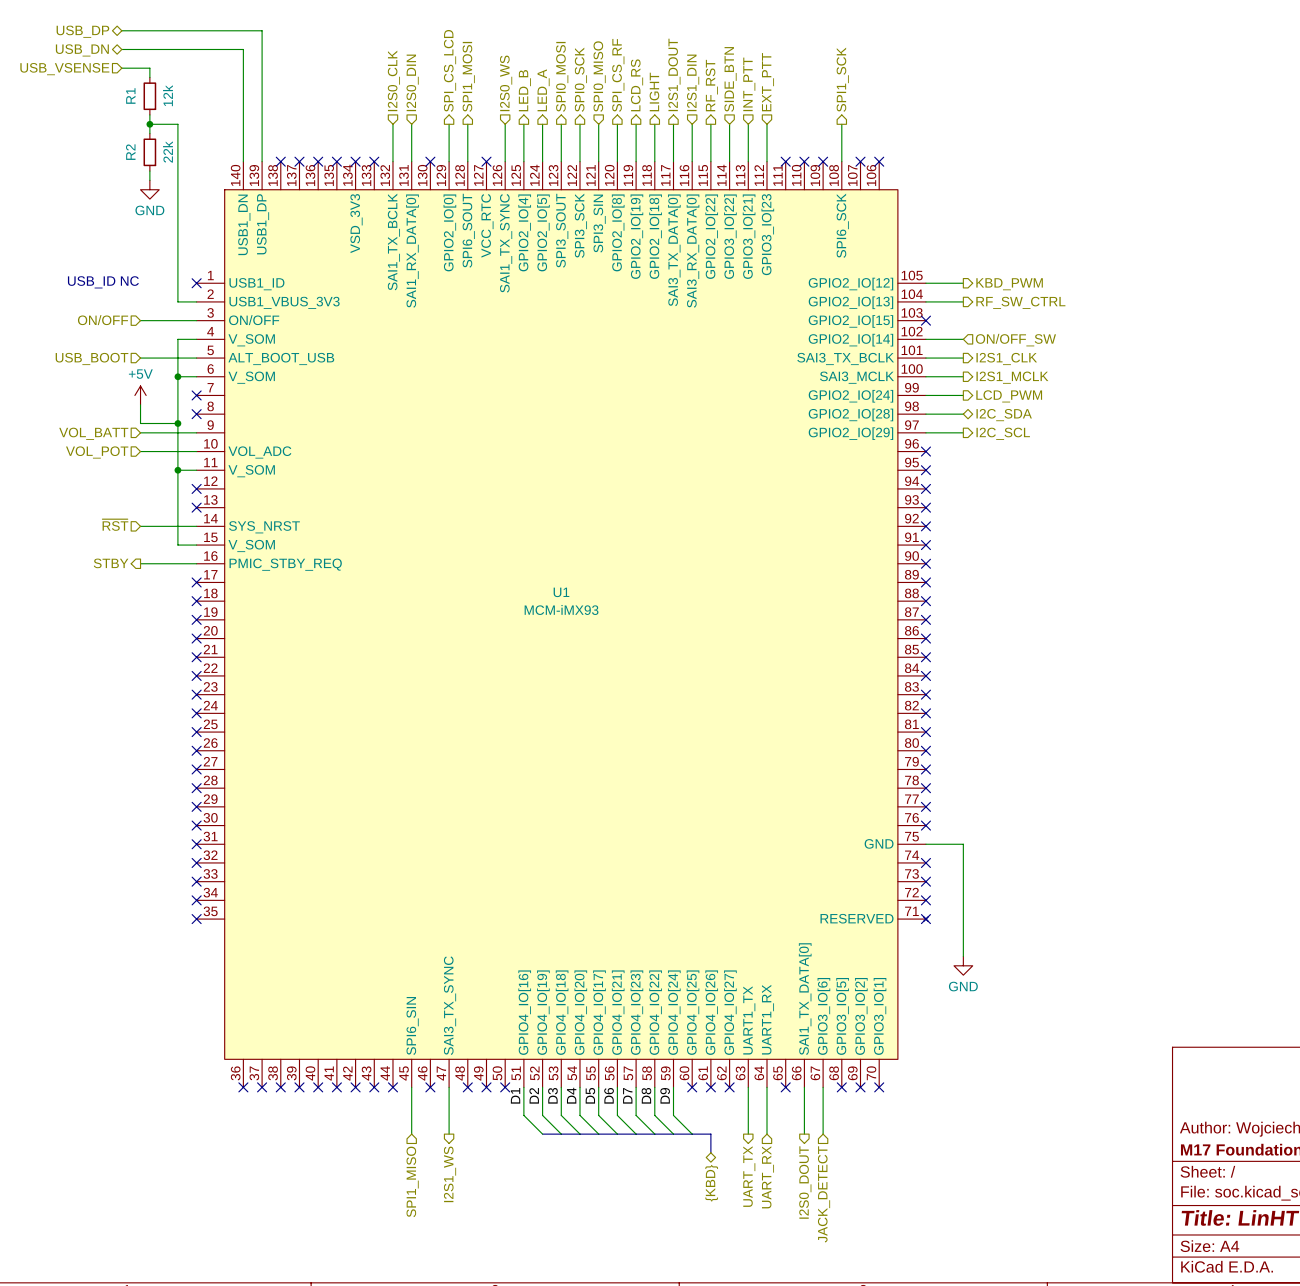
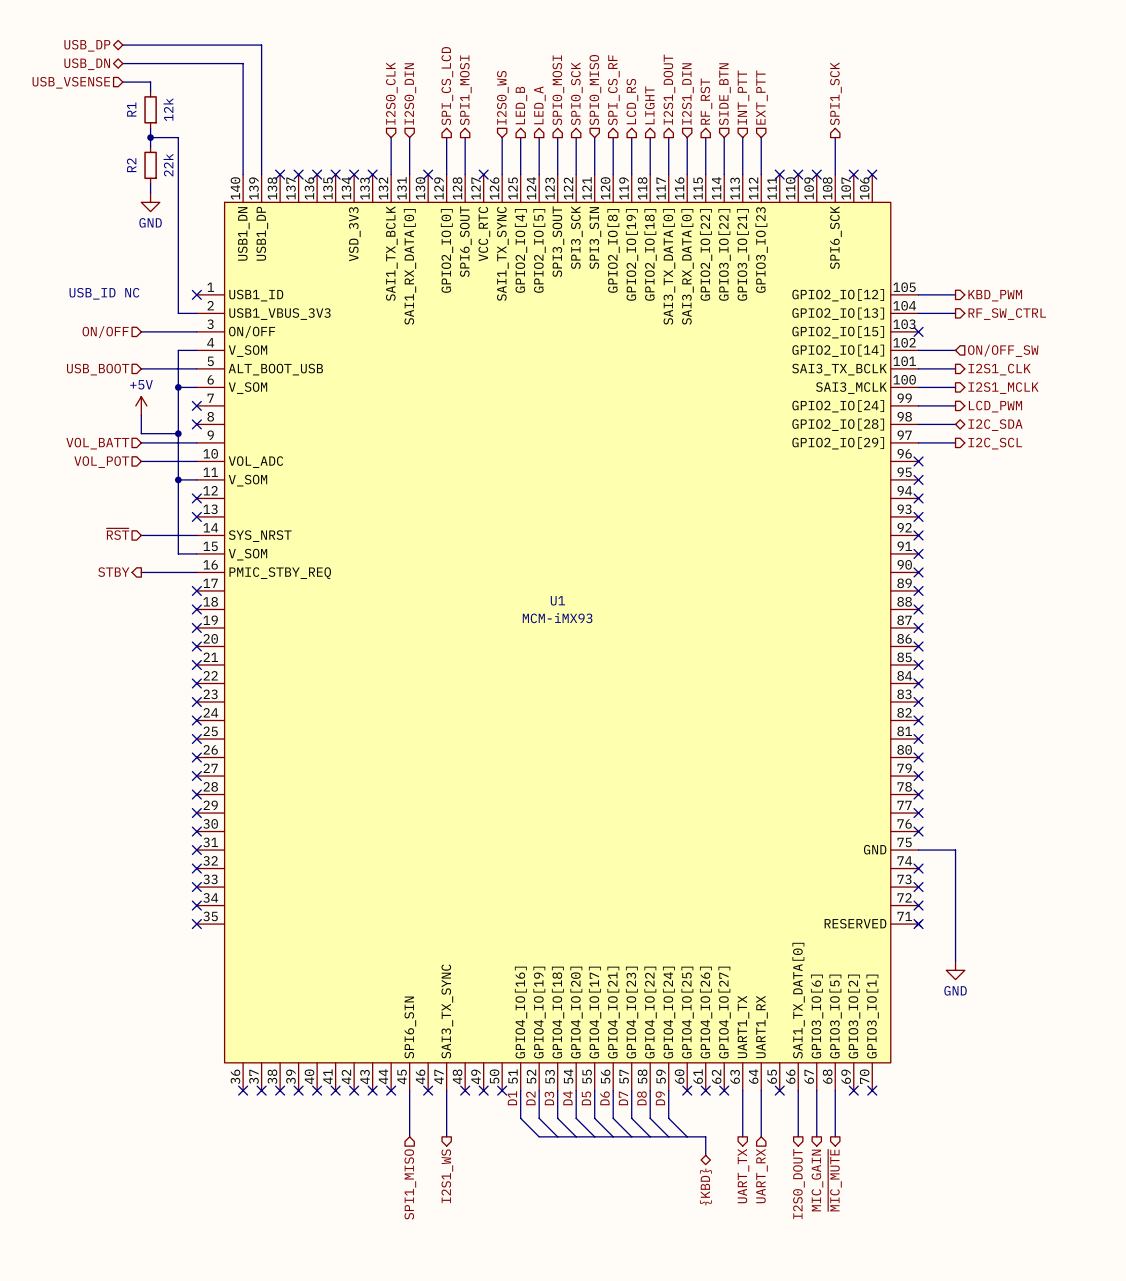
wire: none -> (835, 1090) (835, 1136)
no-connect mark: (841, 1087) -> none
hierarchical label: none -> ~{MIC_MUTE} (834, 1180)
hierarchical label shape: input (824, 1194) -> output (817, 1180)
hierarchical label: JACK_DETECT (824, 1194) -> MIC_GAIN (817, 1180)

